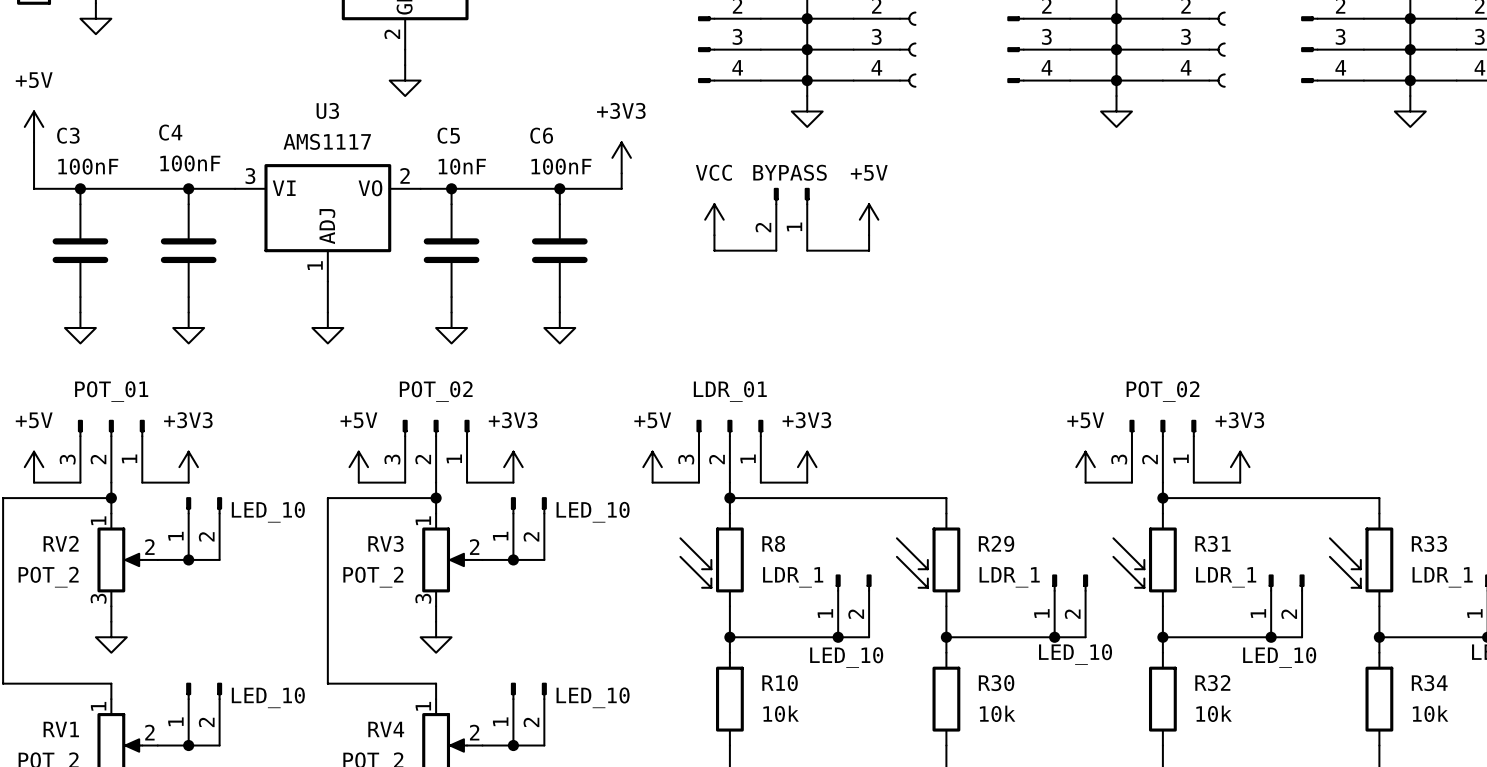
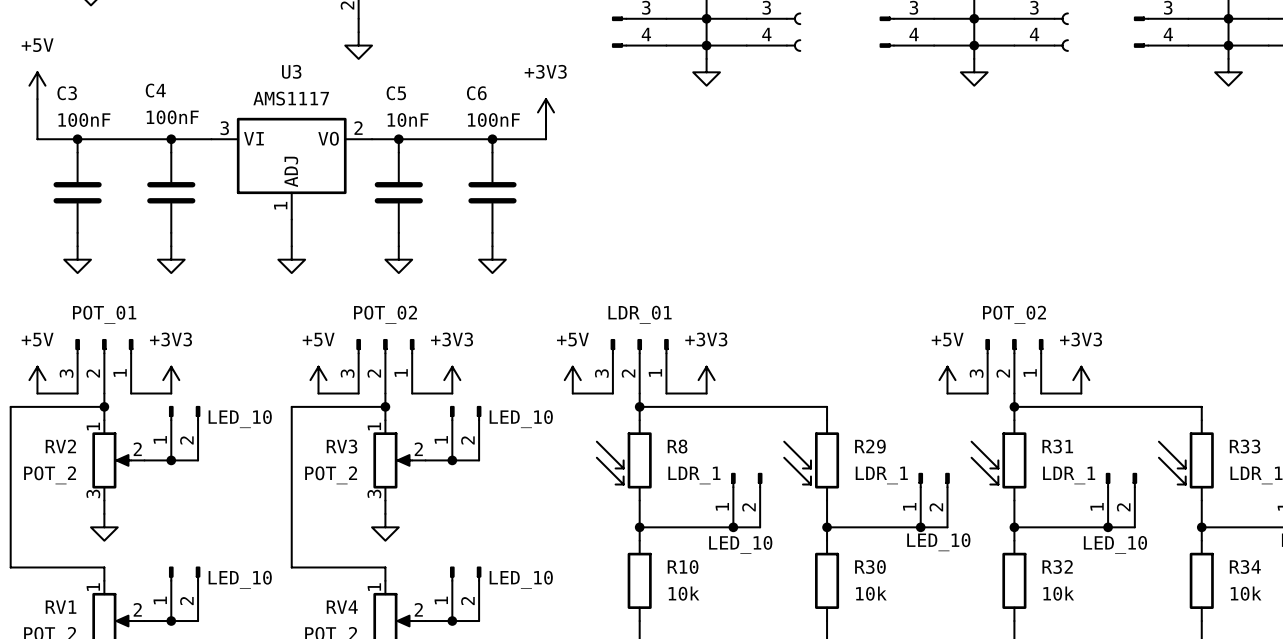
power symbol: VCC (714, 219) -> none
part: BYPASS (791, 219) -> none
power symbol: +5V (869, 219) -> none
wire: (714, 235) (714, 250) (776, 250) -> none
wire: (869, 235) (869, 250) (807, 250) -> none

